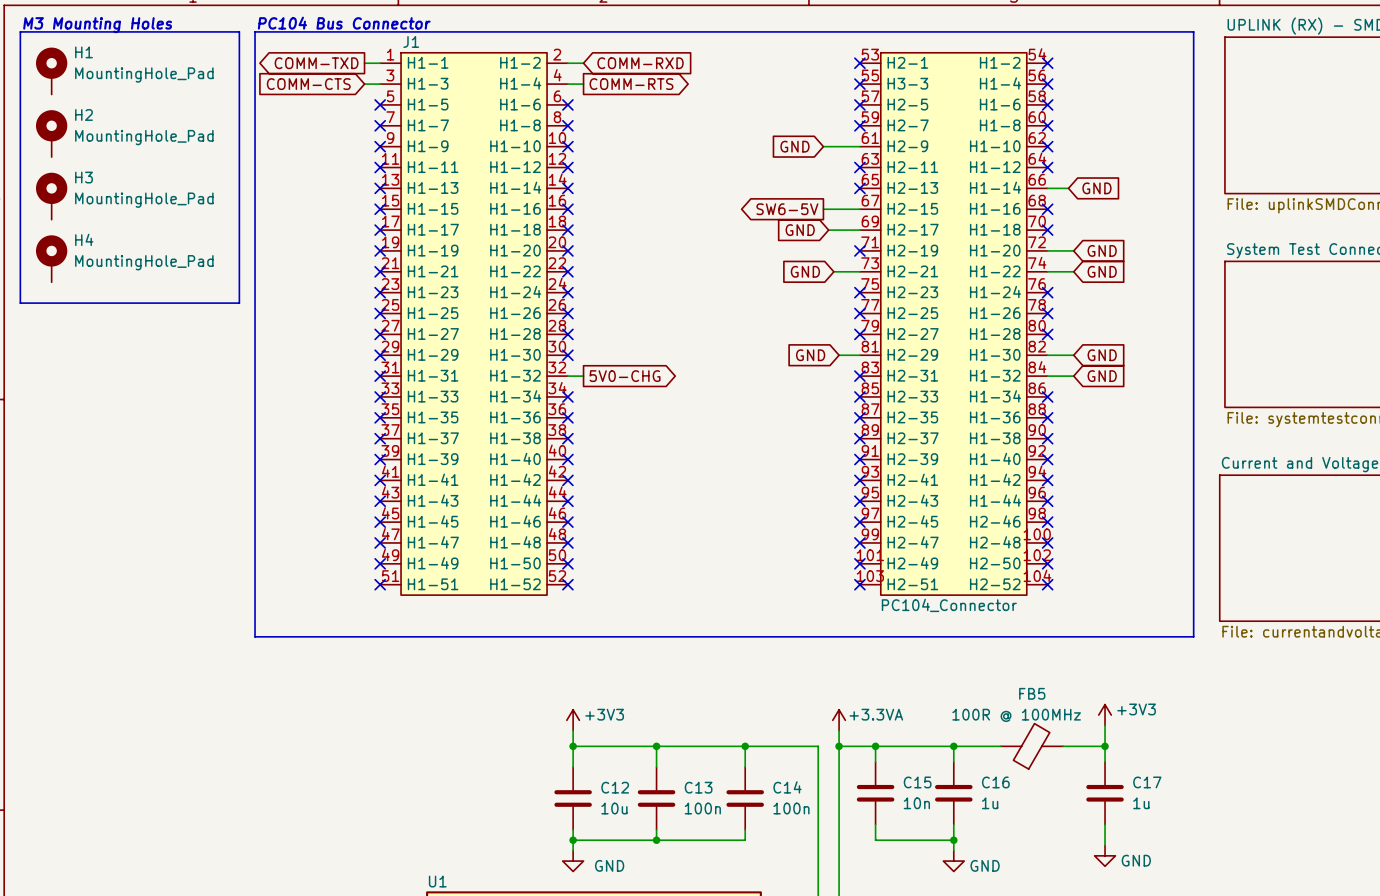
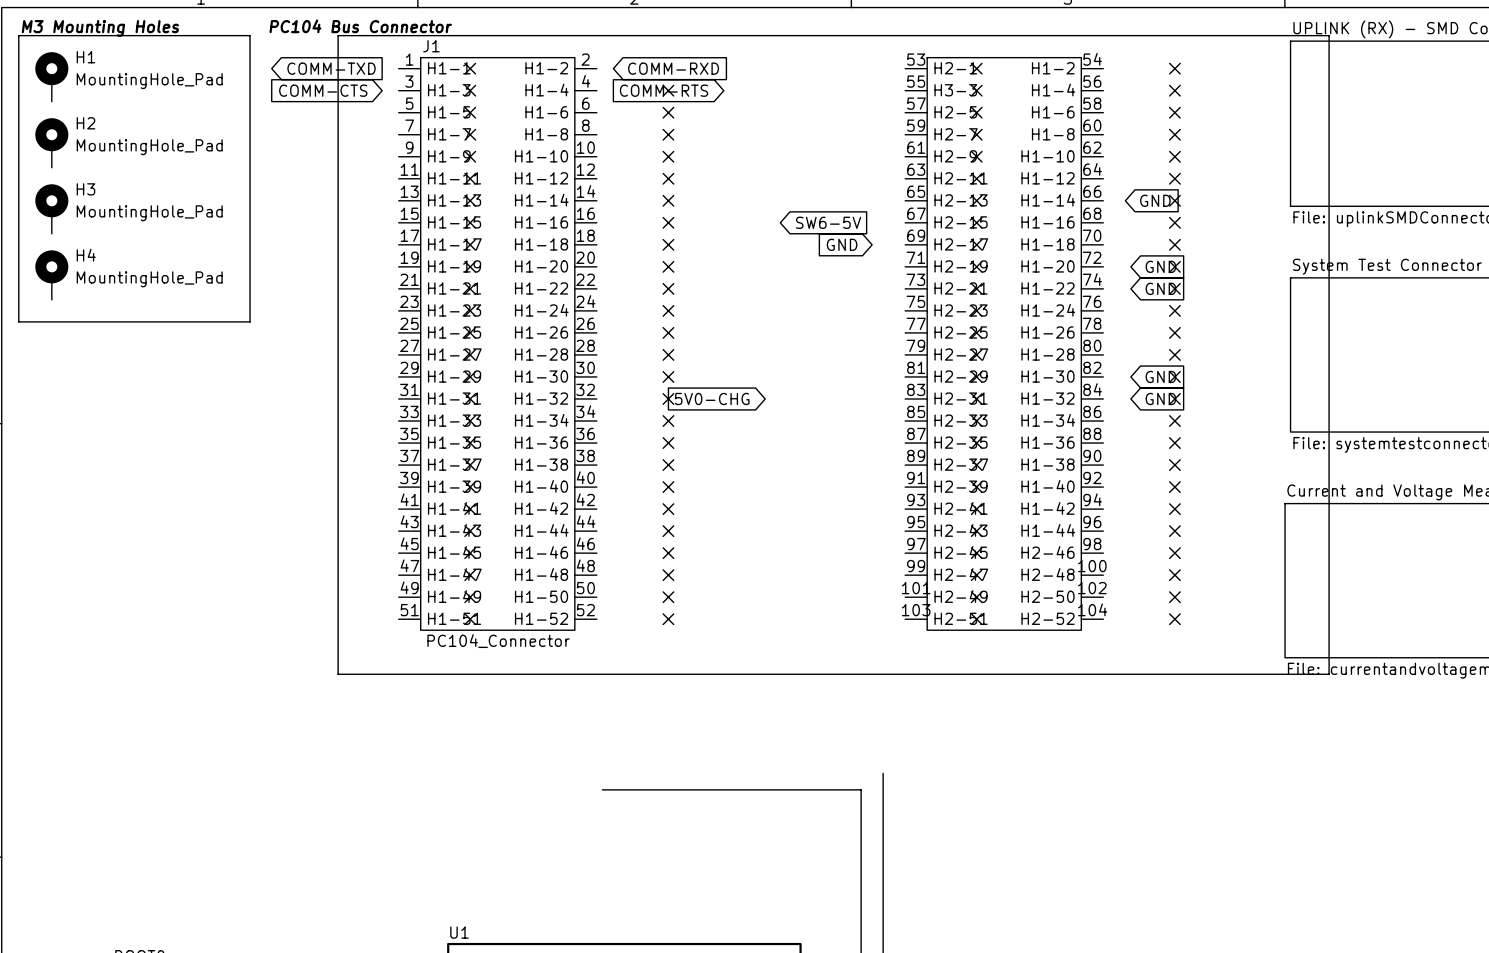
line: (322, 31) (255, 31) (255, 636) (322, 636) -> (338, 35) (338, 674)
line: (1193, 31) (1193, 636) -> (1257, 35) (1329, 35) (1329, 674) (1257, 674)
wire: (364, 63) (380, 63) -> none
no-connect mark: none -> (470, 68)
wire: (567, 63) (583, 63) -> none
no-connect mark: (859, 63) -> none
no-connect mark: none -> (976, 68)
no-connect mark: (1047, 63) -> none
no-connect mark: none -> (1174, 68)
wire: (364, 84) (380, 84) -> none
no-connect mark: none -> (470, 90)
wire: (567, 84) (583, 84) -> none
no-connect mark: none -> (668, 90)
no-connect mark: (859, 84) -> none
no-connect mark: none -> (976, 90)
no-connect mark: (1047, 84) -> none
no-connect mark: none -> (1174, 90)
no-connect mark: (380, 104) -> none
no-connect mark: none -> (470, 112)
no-connect mark: (567, 104) -> none
no-connect mark: none -> (668, 112)
no-connect mark: (859, 104) -> none
no-connect mark: none -> (976, 112)
no-connect mark: (1047, 104) -> none
no-connect mark: none -> (1174, 112)
no-connect mark: (380, 125) -> none
no-connect mark: none -> (470, 134)
no-connect mark: (567, 125) -> none
no-connect mark: none -> (668, 134)
no-connect mark: (859, 125) -> none
no-connect mark: none -> (976, 134)
no-connect mark: (1047, 125) -> none
no-connect mark: none -> (1174, 134)
no-connect mark: (380, 146) -> none
no-connect mark: none -> (470, 156)
no-connect mark: (567, 146) -> none
no-connect mark: none -> (668, 156)
global label: GND (794, 146) -> none
wire: (823, 146) (859, 146) -> none
no-connect mark: none -> (976, 156)
no-connect mark: (1047, 146) -> none
no-connect mark: none -> (1174, 156)
no-connect mark: (380, 167) -> none
no-connect mark: none -> (470, 178)
no-connect mark: (567, 167) -> none
no-connect mark: none -> (668, 178)
no-connect mark: (859, 167) -> none
no-connect mark: none -> (976, 178)
no-connect mark: (1047, 167) -> none
no-connect mark: none -> (1174, 178)
no-connect mark: (380, 188) -> none
no-connect mark: none -> (470, 200)
no-connect mark: (567, 188) -> none
no-connect mark: none -> (668, 200)
no-connect mark: (859, 188) -> none
no-connect mark: none -> (976, 200)
wire: (1047, 188) (1068, 188) -> none
no-connect mark: none -> (1174, 200)
no-connect mark: (380, 209) -> none
no-connect mark: none -> (470, 222)
no-connect mark: (567, 209) -> none
no-connect mark: none -> (668, 222)
wire: (823, 209) (859, 209) -> none
no-connect mark: none -> (976, 222)
no-connect mark: (1047, 209) -> none
no-connect mark: none -> (1174, 222)
no-connect mark: (380, 230) -> none
no-connect mark: none -> (470, 244)
no-connect mark: (567, 230) -> none
no-connect mark: none -> (668, 244)
wire: (828, 230) (859, 230) -> none
no-connect mark: none -> (976, 244)
no-connect mark: (1047, 230) -> none
no-connect mark: none -> (1174, 244)
no-connect mark: (380, 250) -> none
no-connect mark: none -> (470, 266)
no-connect mark: (567, 250) -> none
no-connect mark: none -> (668, 266)
no-connect mark: (859, 250) -> none
no-connect mark: none -> (976, 266)
wire: (1047, 250) (1073, 250) -> none
no-connect mark: none -> (1174, 266)
no-connect mark: (380, 271) -> none
no-connect mark: none -> (470, 288)
no-connect mark: (567, 271) -> none
no-connect mark: none -> (668, 288)
global label: GND (805, 271) -> none
wire: (833, 271) (859, 271) -> none
no-connect mark: none -> (976, 288)
wire: (1047, 271) (1073, 271) -> none
no-connect mark: none -> (1174, 288)
no-connect mark: (380, 292) -> none
no-connect mark: none -> (470, 310)
no-connect mark: (567, 292) -> none
no-connect mark: none -> (668, 310)
no-connect mark: (859, 292) -> none
no-connect mark: none -> (976, 310)
no-connect mark: (1047, 292) -> none
no-connect mark: none -> (1174, 310)
no-connect mark: (380, 313) -> none
no-connect mark: none -> (470, 332)
no-connect mark: (567, 313) -> none
no-connect mark: none -> (668, 332)
no-connect mark: (859, 313) -> none
no-connect mark: none -> (976, 332)
no-connect mark: (1047, 313) -> none
no-connect mark: none -> (1174, 332)
no-connect mark: (380, 334) -> none
no-connect mark: none -> (470, 354)
no-connect mark: (567, 334) -> none
no-connect mark: none -> (668, 354)
no-connect mark: (859, 334) -> none
no-connect mark: none -> (976, 354)
no-connect mark: (1047, 334) -> none
no-connect mark: none -> (1174, 354)
no-connect mark: (380, 355) -> none
no-connect mark: none -> (470, 376)
no-connect mark: (567, 355) -> none
no-connect mark: none -> (668, 376)
global label: GND (810, 355) -> none
wire: (839, 355) (859, 355) -> none
no-connect mark: none -> (976, 376)
wire: (1047, 355) (1073, 355) -> none
no-connect mark: none -> (1174, 376)
no-connect mark: (380, 376) -> none
no-connect mark: none -> (470, 398)
wire: (567, 376) (583, 376) -> none
global label position: 5V0-CHG (625, 376) -> 5V0-CHG (712, 398)
no-connect mark: none -> (668, 398)
no-connect mark: (859, 376) -> none
no-connect mark: none -> (976, 398)
wire: (1047, 376) (1073, 376) -> none
no-connect mark: none -> (1174, 398)
no-connect mark: (380, 396) -> none
no-connect mark: none -> (470, 421)
no-connect mark: (567, 396) -> none
no-connect mark: none -> (668, 421)
no-connect mark: (859, 396) -> none
no-connect mark: none -> (976, 421)
no-connect mark: (1047, 396) -> none
no-connect mark: none -> (1174, 421)
no-connect mark: (380, 417) -> none
no-connect mark: none -> (470, 443)
no-connect mark: (567, 417) -> none
no-connect mark: none -> (668, 443)
no-connect mark: (859, 417) -> none
no-connect mark: none -> (976, 443)
no-connect mark: (1047, 417) -> none
no-connect mark: none -> (1174, 443)
no-connect mark: (380, 438) -> none
no-connect mark: none -> (470, 465)
no-connect mark: (567, 438) -> none
no-connect mark: none -> (668, 465)
no-connect mark: (859, 438) -> none
no-connect mark: none -> (976, 465)
no-connect mark: (1047, 438) -> none
no-connect mark: none -> (1174, 465)
no-connect mark: (380, 459) -> none
no-connect mark: none -> (470, 487)
no-connect mark: (567, 459) -> none
no-connect mark: none -> (668, 487)
no-connect mark: (859, 459) -> none
no-connect mark: none -> (976, 487)
no-connect mark: (1047, 459) -> none
no-connect mark: none -> (1174, 487)
no-connect mark: (380, 480) -> none
no-connect mark: none -> (470, 509)
no-connect mark: (567, 480) -> none
no-connect mark: none -> (668, 509)
no-connect mark: (859, 480) -> none
no-connect mark: none -> (976, 509)
no-connect mark: (1047, 480) -> none
no-connect mark: none -> (1174, 509)
no-connect mark: (380, 501) -> none
no-connect mark: none -> (470, 531)
no-connect mark: (567, 501) -> none
no-connect mark: none -> (668, 531)
no-connect mark: (859, 501) -> none
no-connect mark: none -> (976, 531)
no-connect mark: (1047, 501) -> none
no-connect mark: none -> (1174, 531)
no-connect mark: (380, 522) -> none
no-connect mark: none -> (470, 553)
no-connect mark: (567, 522) -> none
no-connect mark: none -> (668, 553)
no-connect mark: (859, 522) -> none
no-connect mark: none -> (976, 553)
no-connect mark: (1047, 522) -> none
no-connect mark: none -> (1174, 553)
no-connect mark: (380, 542) -> none
no-connect mark: none -> (470, 575)
no-connect mark: (567, 542) -> none
no-connect mark: none -> (668, 575)
no-connect mark: (859, 542) -> none
no-connect mark: none -> (976, 575)
no-connect mark: (1047, 542) -> none
no-connect mark: none -> (1174, 575)
no-connect mark: (380, 563) -> none
no-connect mark: none -> (470, 597)
no-connect mark: (567, 563) -> none
no-connect mark: none -> (668, 597)
no-connect mark: (859, 563) -> none
no-connect mark: none -> (976, 597)
no-connect mark: (1047, 563) -> none
no-connect mark: none -> (1174, 597)
no-connect mark: (380, 584) -> none
no-connect mark: none -> (470, 619)
no-connect mark: (567, 584) -> none
no-connect mark: none -> (668, 619)
no-connect mark: (859, 584) -> none
no-connect mark: none -> (976, 619)
no-connect mark: (1047, 584) -> none
no-connect mark: none -> (1174, 619)
J1 value position: PC104_Connector (949, 605) -> PC104_Connector (498, 641)
power symbol: +3V3 (1105, 715) -> none
power symbol: +3V3 (573, 720) -> none
power symbol: +3.3VA (839, 720) -> none
wire: (1105, 725) (1105, 761) -> none
wire: (573, 730) (573, 767) -> none
junction: (573, 746) -> none
wire: (656, 746) (656, 767) -> none
junction: (656, 746) -> none
wire: (745, 746) (745, 767) -> none
junction: (745, 746) -> none
wire: (839, 746) (1000, 746) -> none
junction: (839, 746) -> none
wire: (875, 746) (875, 761) -> none
junction: (875, 746) -> none
wire: (953, 746) (953, 761) -> none
junction: (953, 746) -> none
FB5: 100R @ 100MHz (1032, 746) -> none
wire: (1063, 746) (1105, 746) -> none
junction: (1105, 746) -> none
C15: 10n (875, 793) -> none
C16: 1u (953, 793) -> none
C17: 1u (1105, 793) -> none
C12: 10u (573, 798) -> none
C13: 100n (656, 798) -> none
C14: 100n (745, 798) -> none
wire: (875, 824) (875, 840) (953, 840) -> none
wire: (953, 824) (953, 850) -> none
wire: (1105, 824) (1105, 845) -> none
wire: (573, 829) (573, 850) -> none
wire: (656, 829) (656, 840) -> none
wire: (745, 829) (745, 840) (573, 840) -> none
junction: (573, 840) -> none
junction: (656, 840) -> none
junction: (953, 840) -> none
power symbol: GND (1105, 855) -> none
power symbol: GND (573, 861) -> none
power symbol: GND (953, 861) -> none

